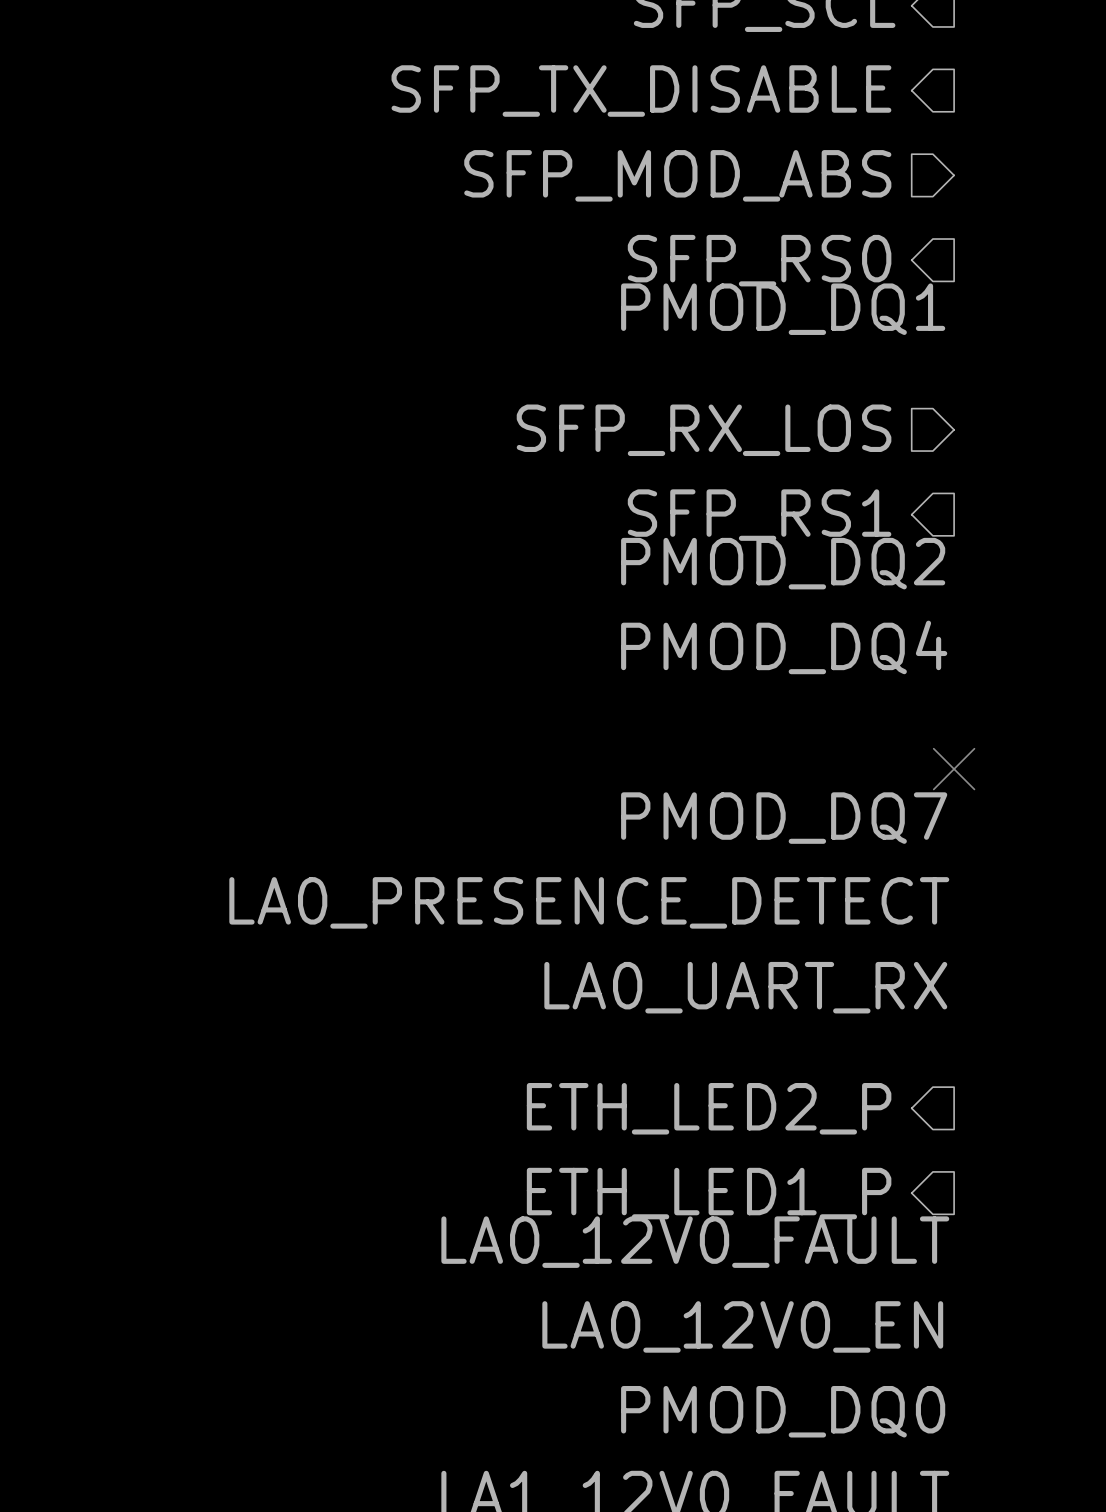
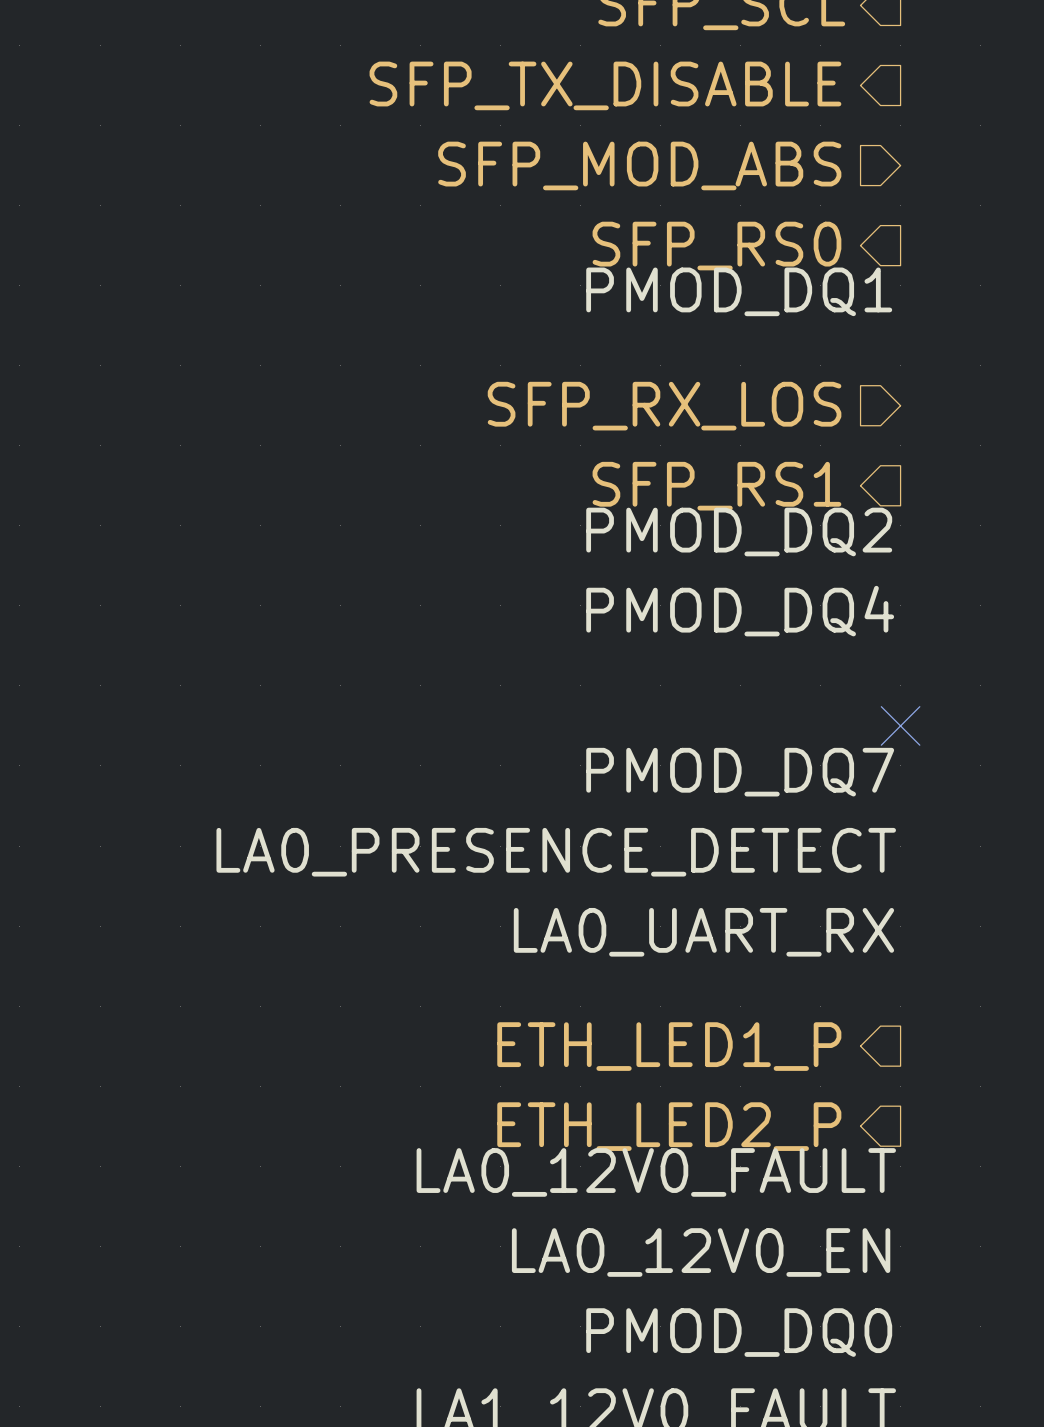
hierarchical label: ETH_LED2_P (709, 1108) -> ETH_LED1_P (669, 1046)
hierarchical label: ETH_LED1_P (709, 1193) -> ETH_LED2_P (669, 1126)

